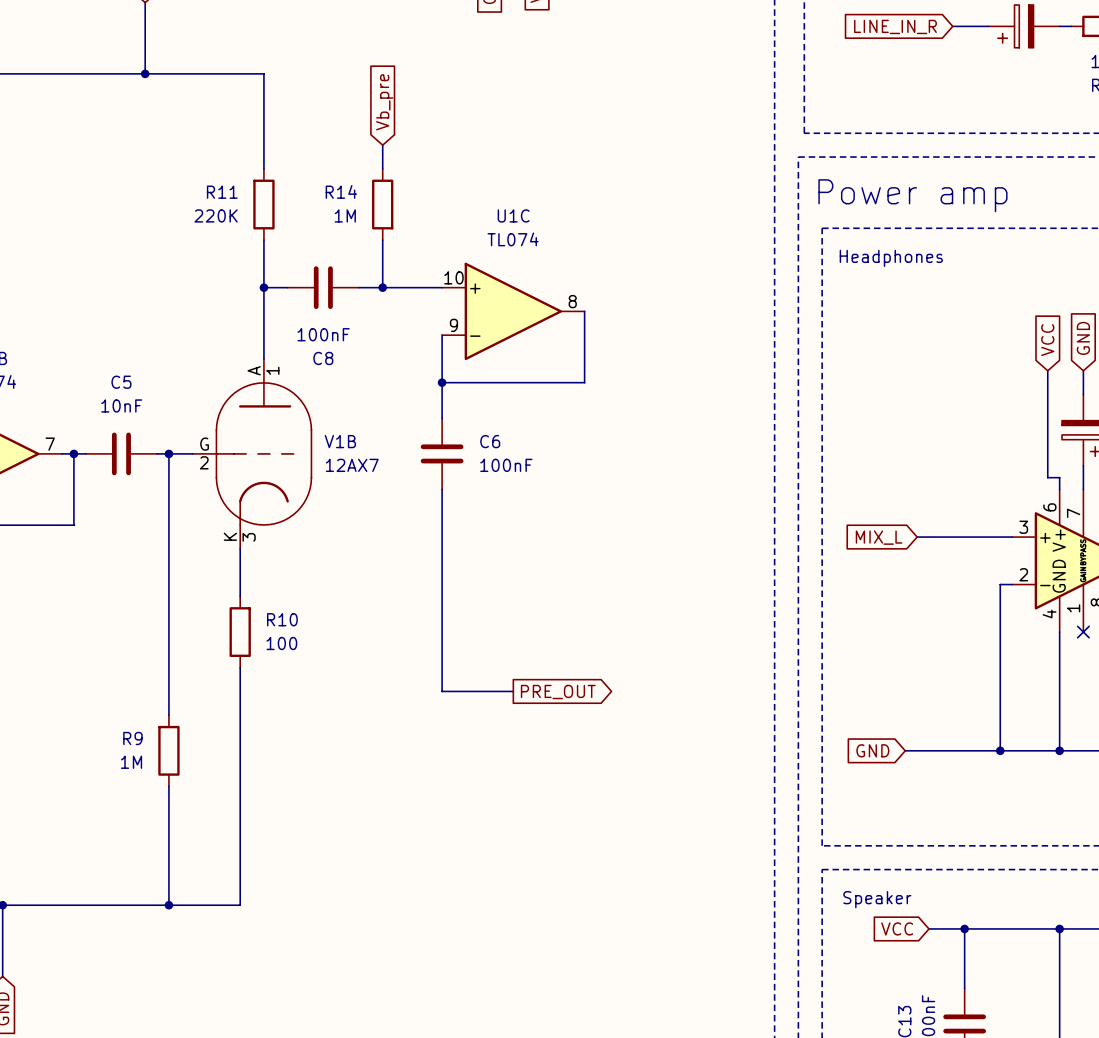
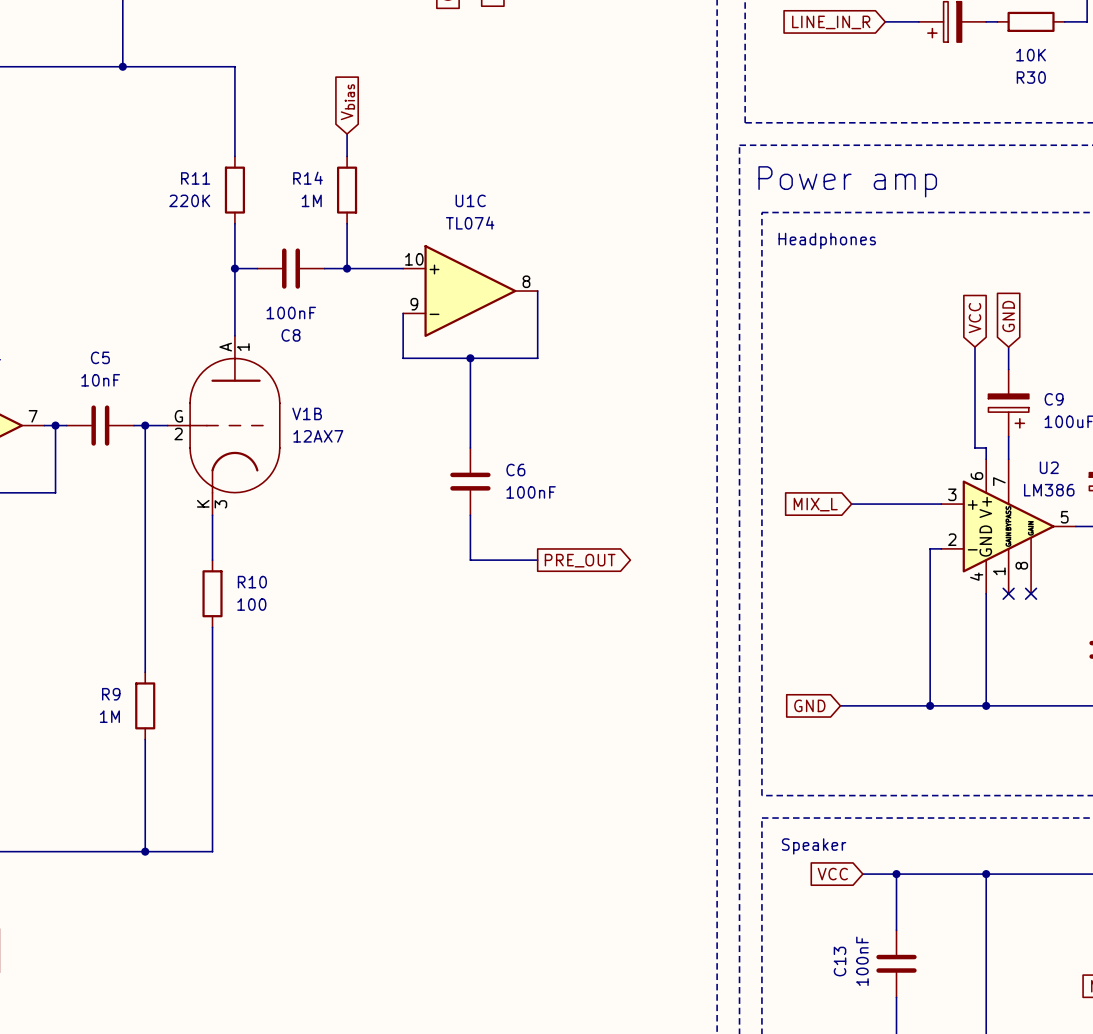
global label: Vb_pre (384, 102) -> Vbias (347, 102)
wire: (442, 382) (442, 418) -> none
junction: (442, 382) -> none
wire: none -> (470, 358) (470, 447)
junction: none -> (470, 358)
C6 position: (442, 453) -> (470, 481)
wire: (442, 489) (442, 691) (513, 691) -> none
wire: none -> (470, 515) (470, 560) (537, 560)
global label position: PRE_OUT (558, 692) -> PRE_OUT (580, 560)

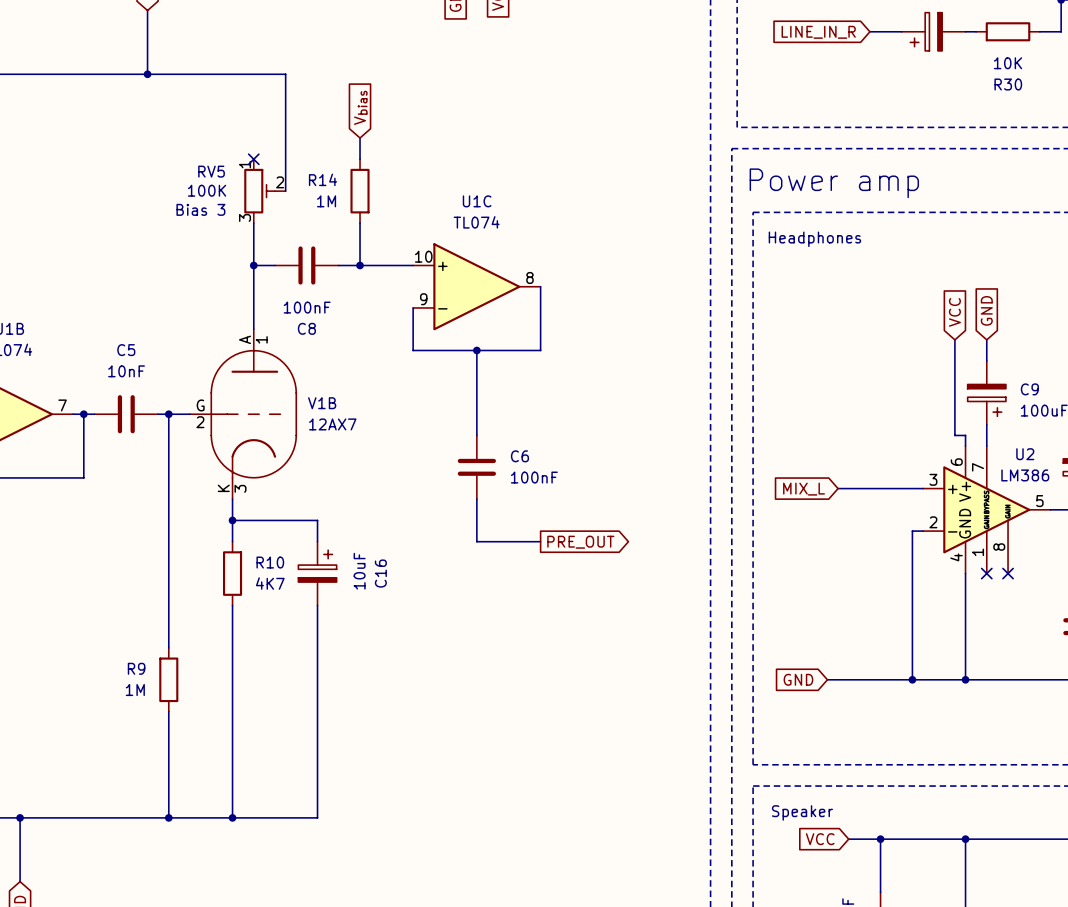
wire: (234, 66) (234, 156) -> (253, 74) (285, 74) (285, 191)
no-connect mark: none -> (253, 159)
R11: 220K (234, 190) -> none
RV5: none -> 100K (264, 191)
wire: none -> (232, 520) (317, 520) (317, 541)
junction: none -> (232, 520)
C16: none -> 10uF (317, 573)
R10 value: 100 (251, 604) -> 4K7 (270, 583)
wire: none -> (317, 605) (317, 817) (232, 817)
junction: none -> (232, 817)

